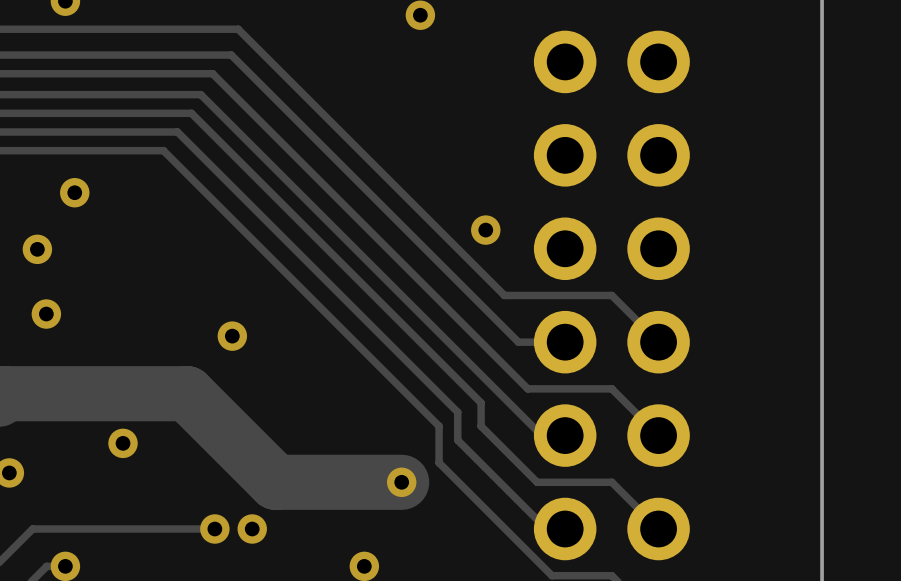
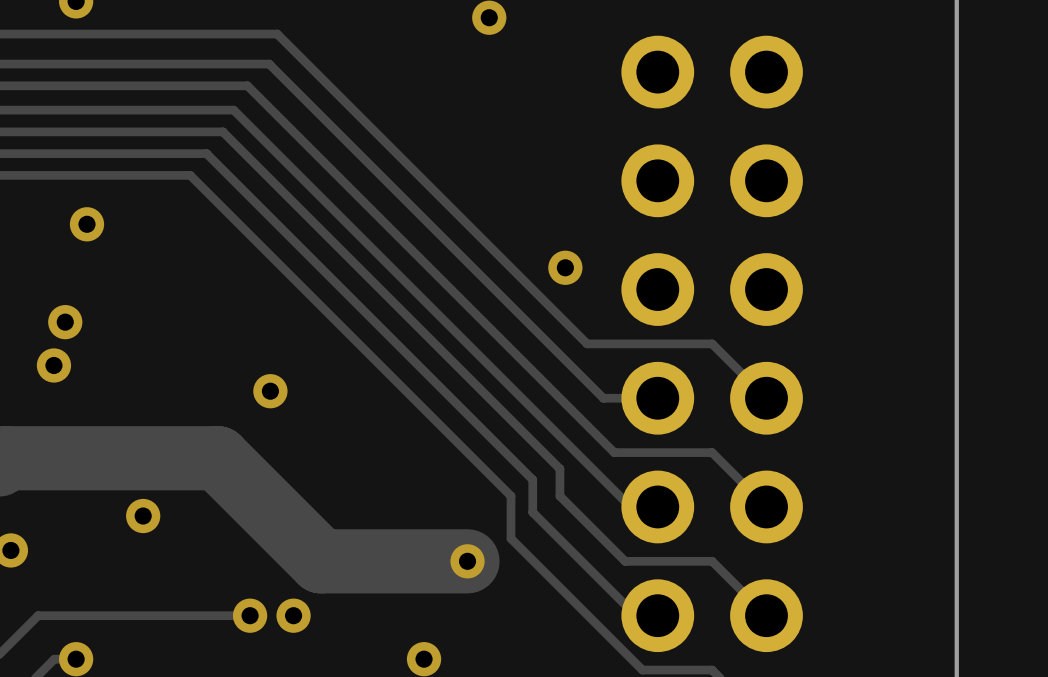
via position: (37, 249) -> (65, 322)

